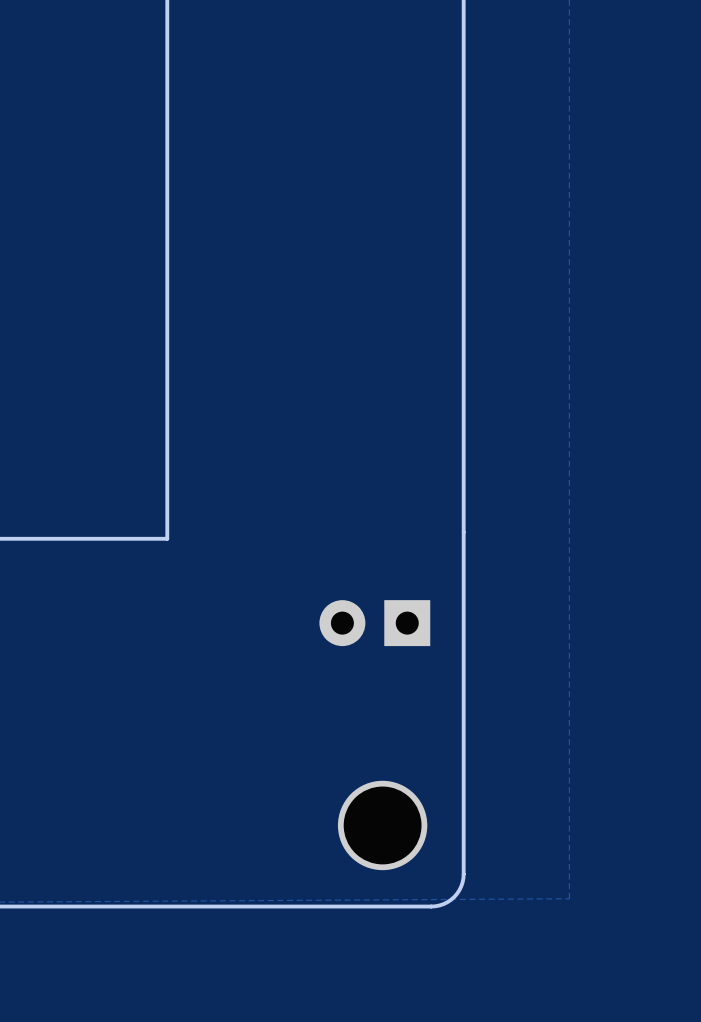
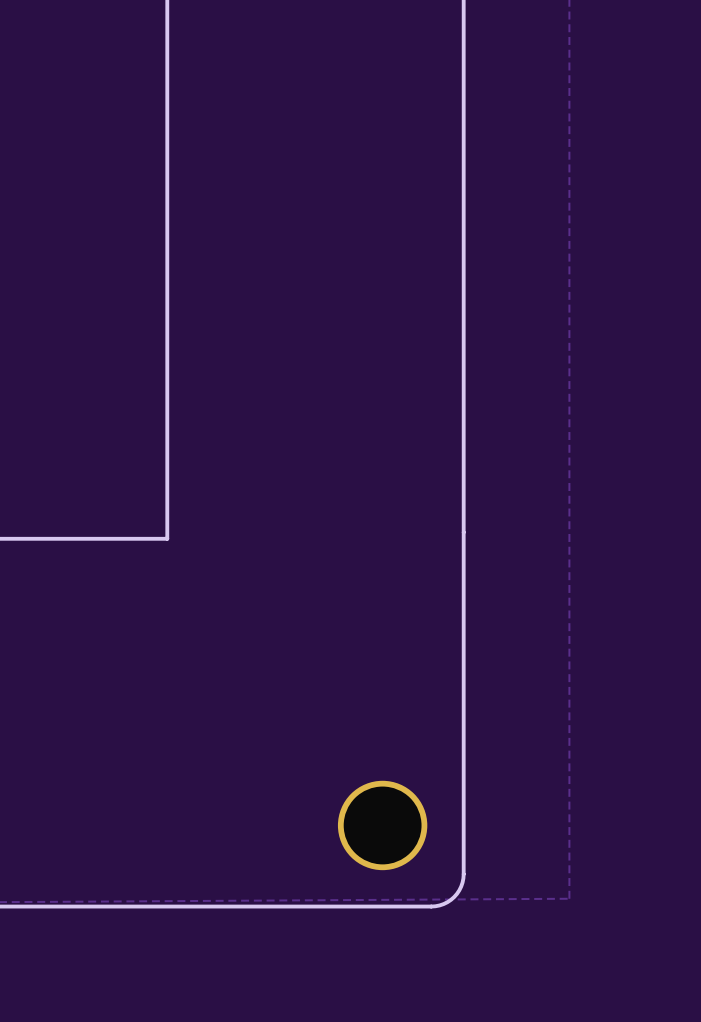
part: (374, 623) -> none

